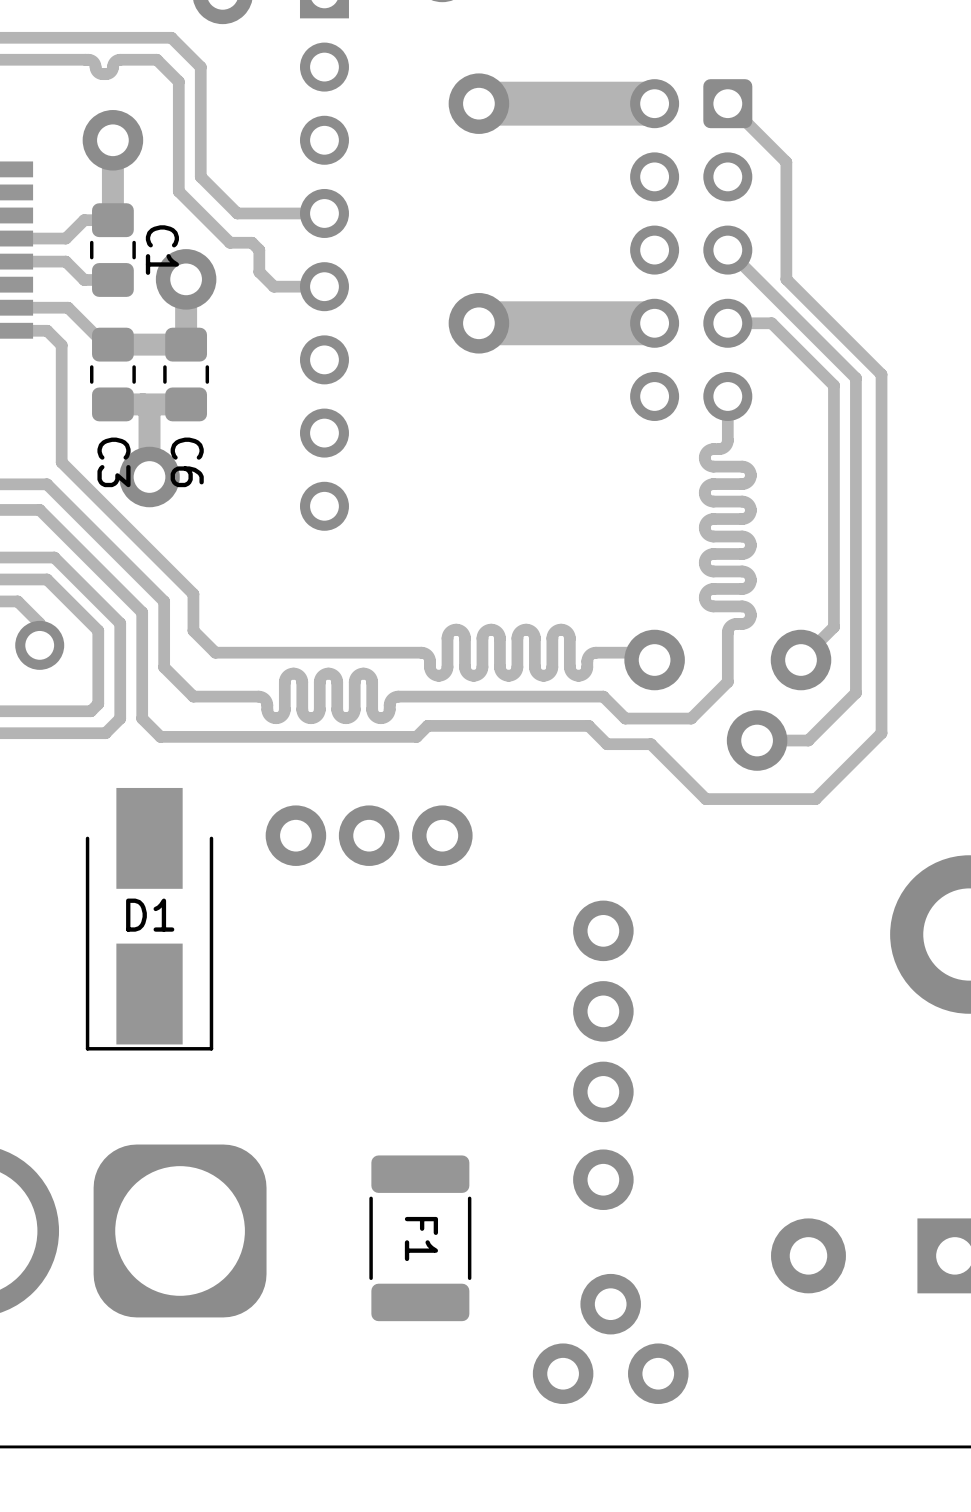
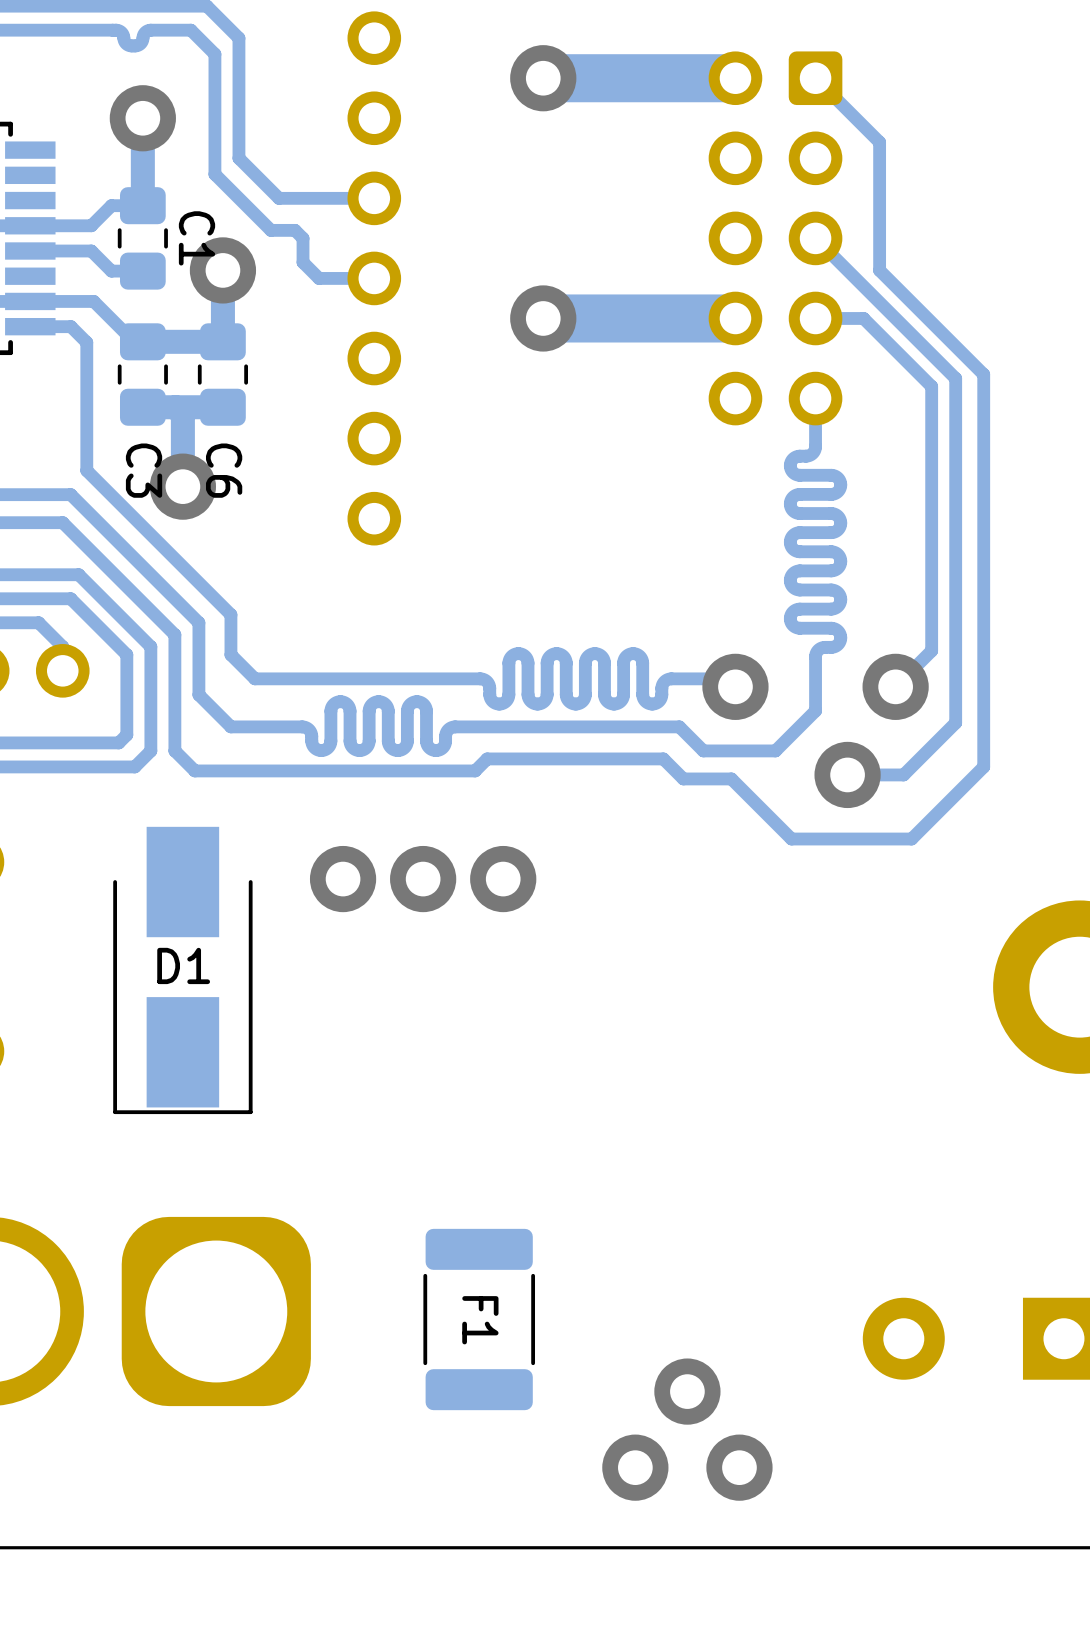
via: (603, 930) -> none
via: (603, 1011) -> none
via: (603, 1091) -> none
via: (603, 1179) -> none

